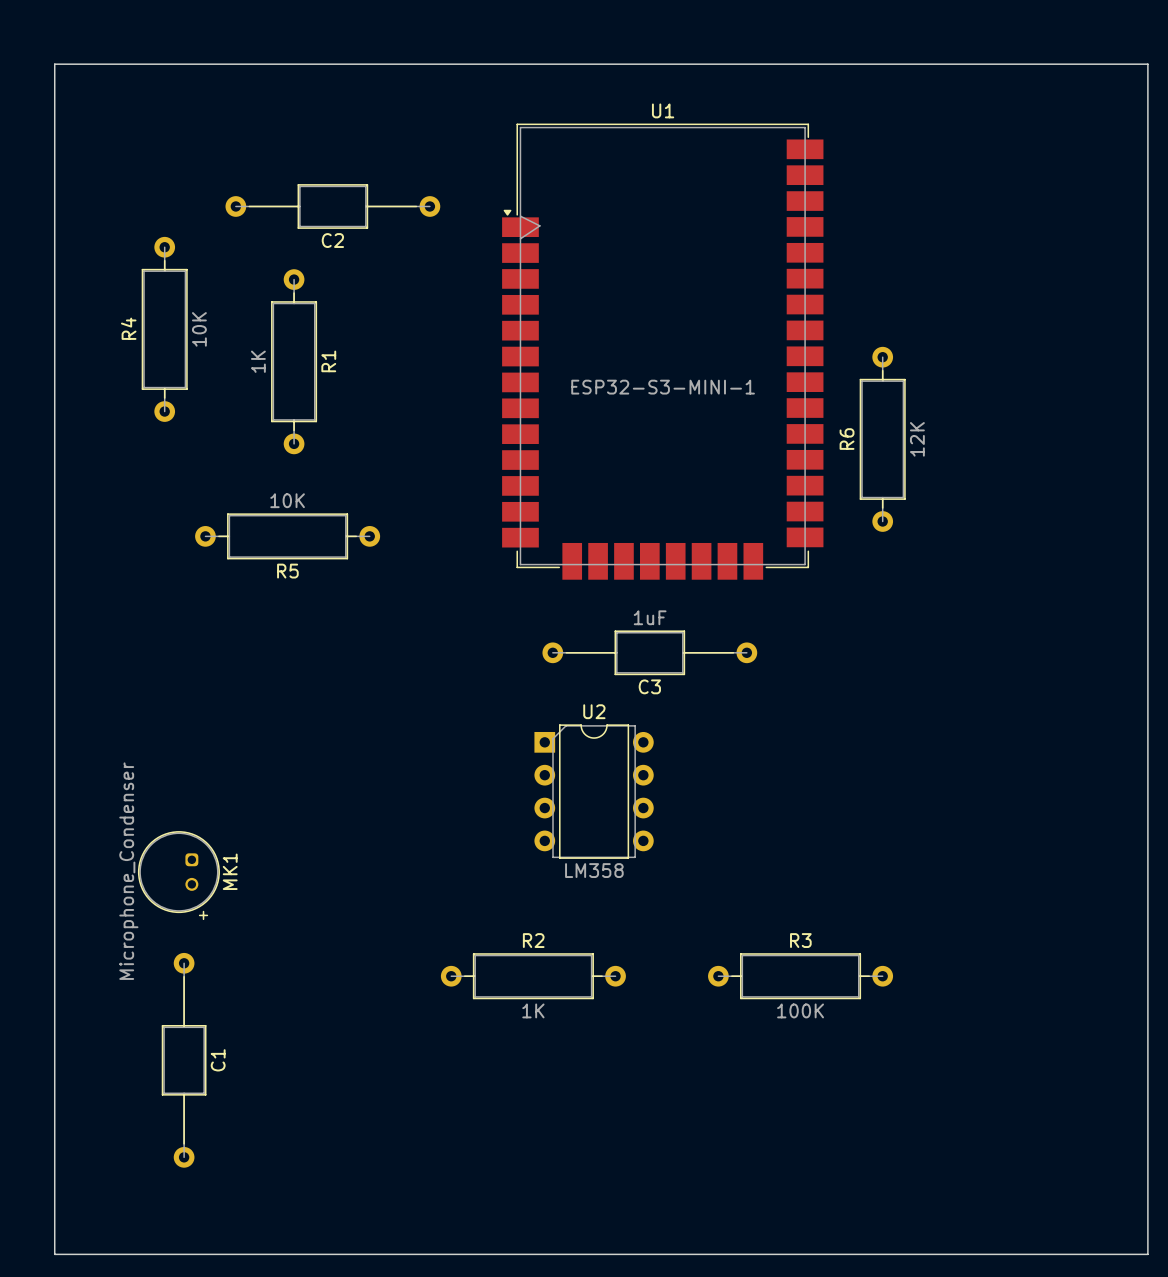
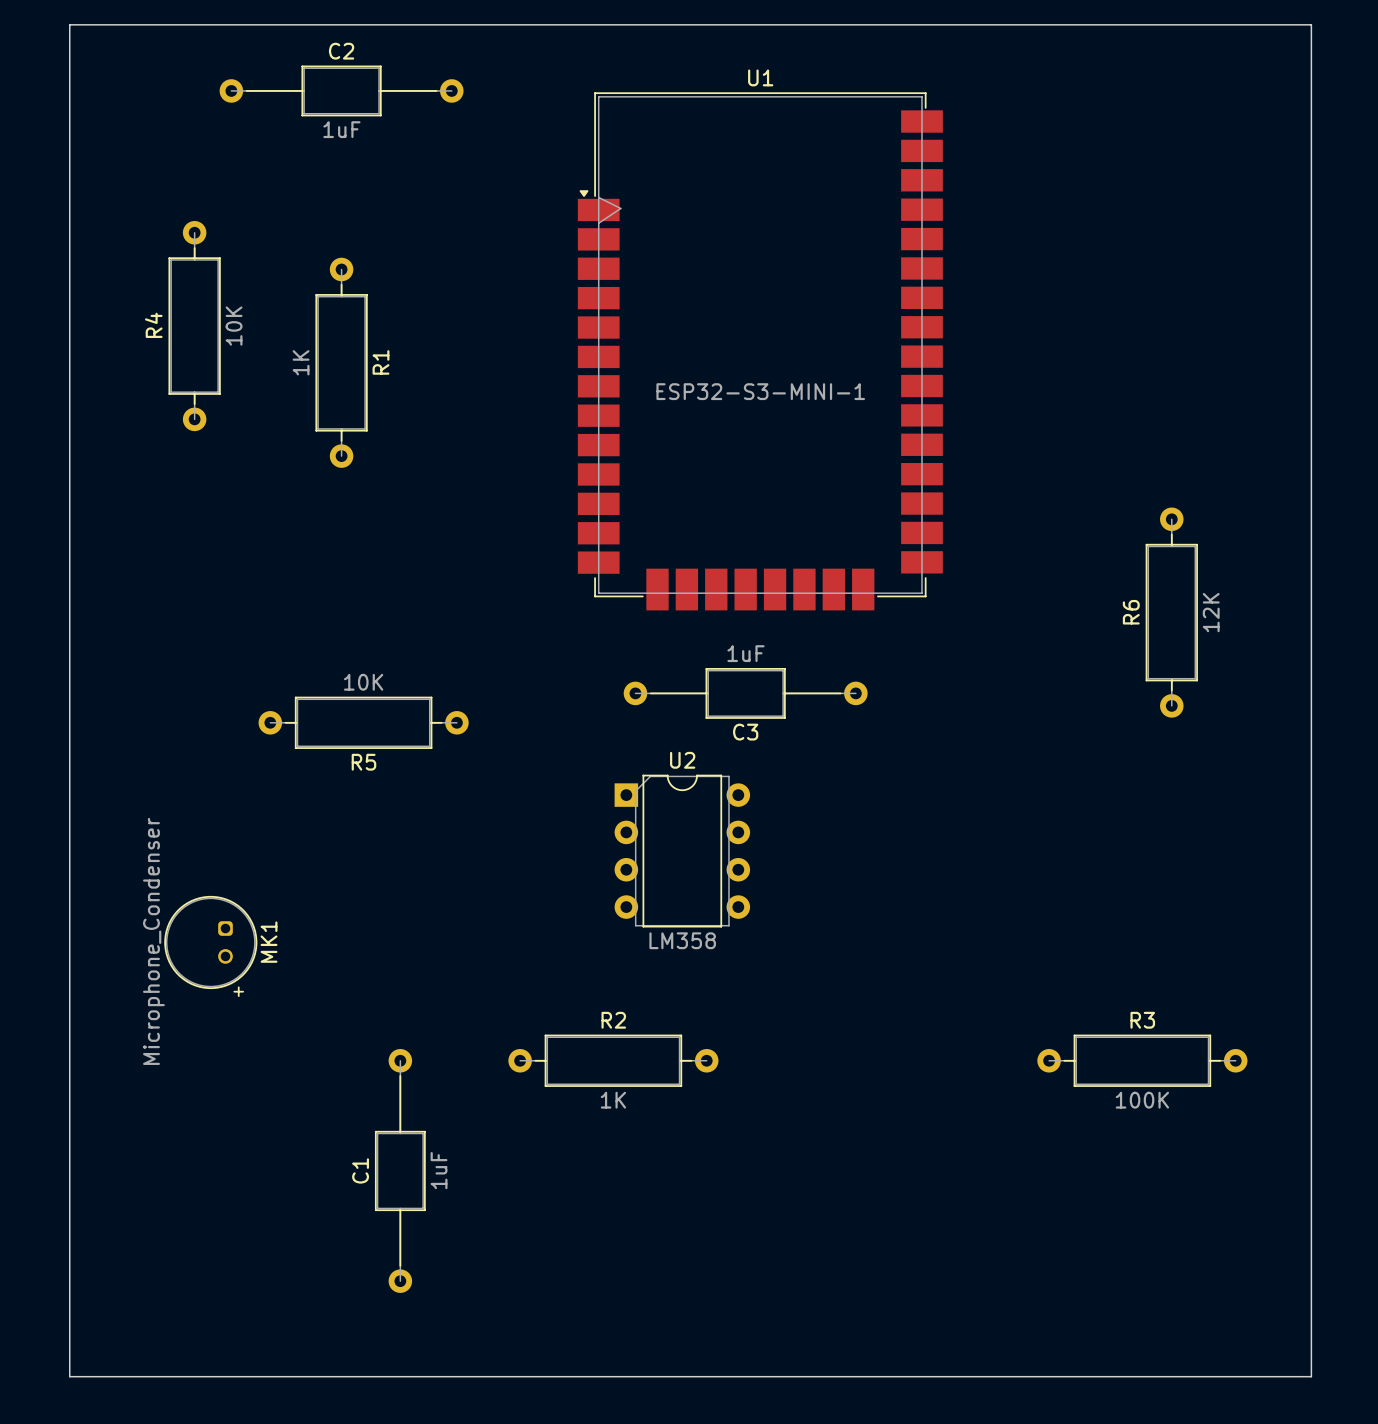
C2 value: none -> 1uF (341, 129)
C2 position: (332, 206) -> (341, 90)
C2 name position: C2 (332, 240) -> C2 (341, 51)
R6 position: (882, 439) -> (1171, 612)
R5 position: (287, 536) -> (363, 722)
R3 position: (800, 976) -> (1142, 1060)
C1 position: (184, 1060) -> (400, 1170)
C1 name position: C1 (218, 1060) -> C1 (360, 1170)
C1 value: none -> 1uF (439, 1170)

